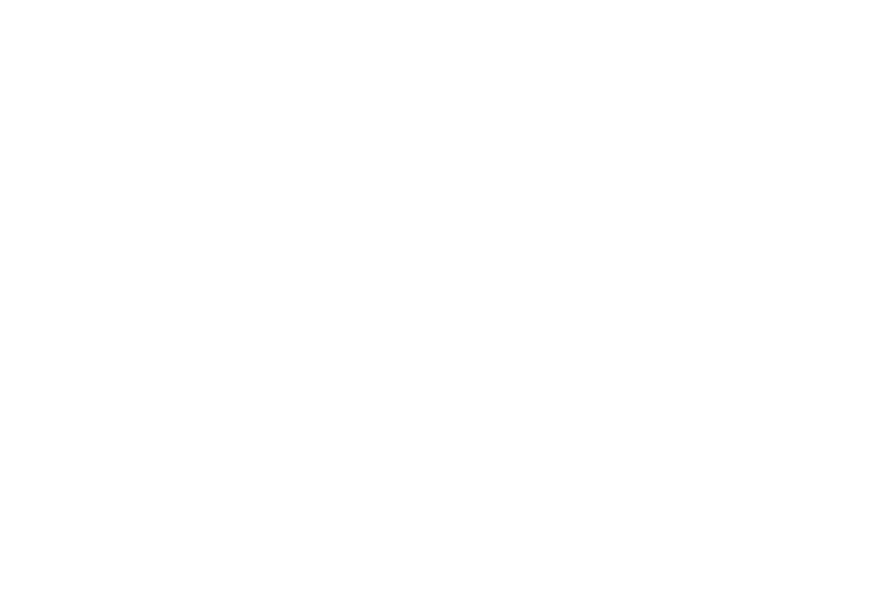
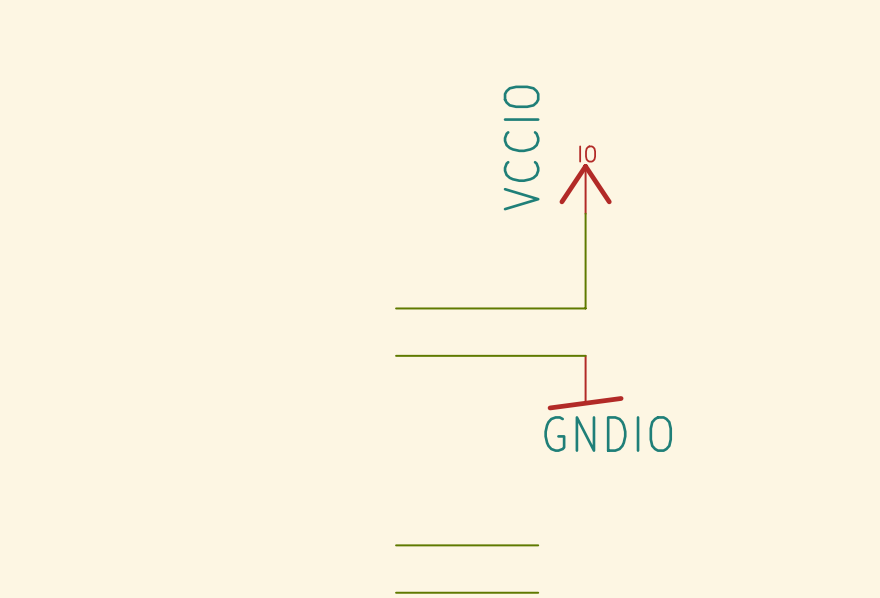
power symbol: none -> VCCIO (585, 188)
wire: none -> (585, 213) (585, 308) (396, 308)
wire: none -> (396, 355) (585, 355)
power symbol: none -> GNDIO (585, 383)
wire: none -> (396, 545) (538, 545)
wire: none -> (396, 592) (538, 592)

